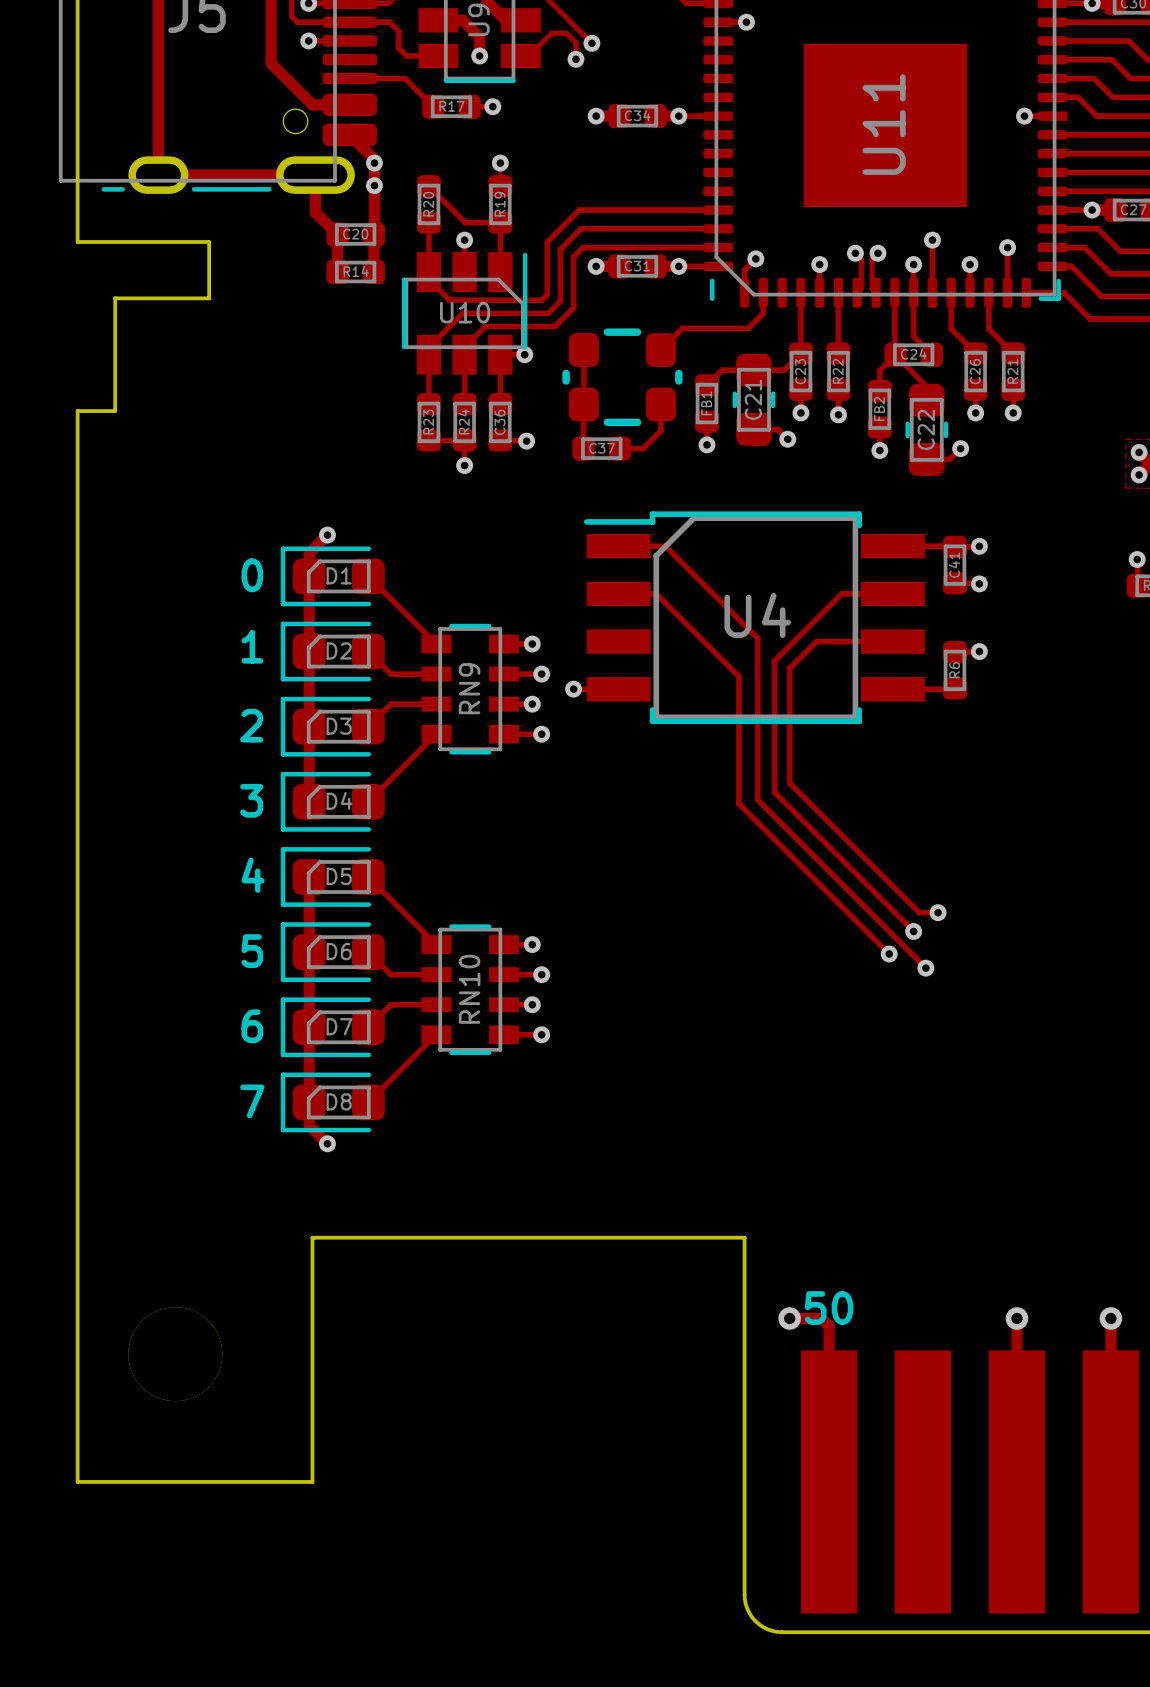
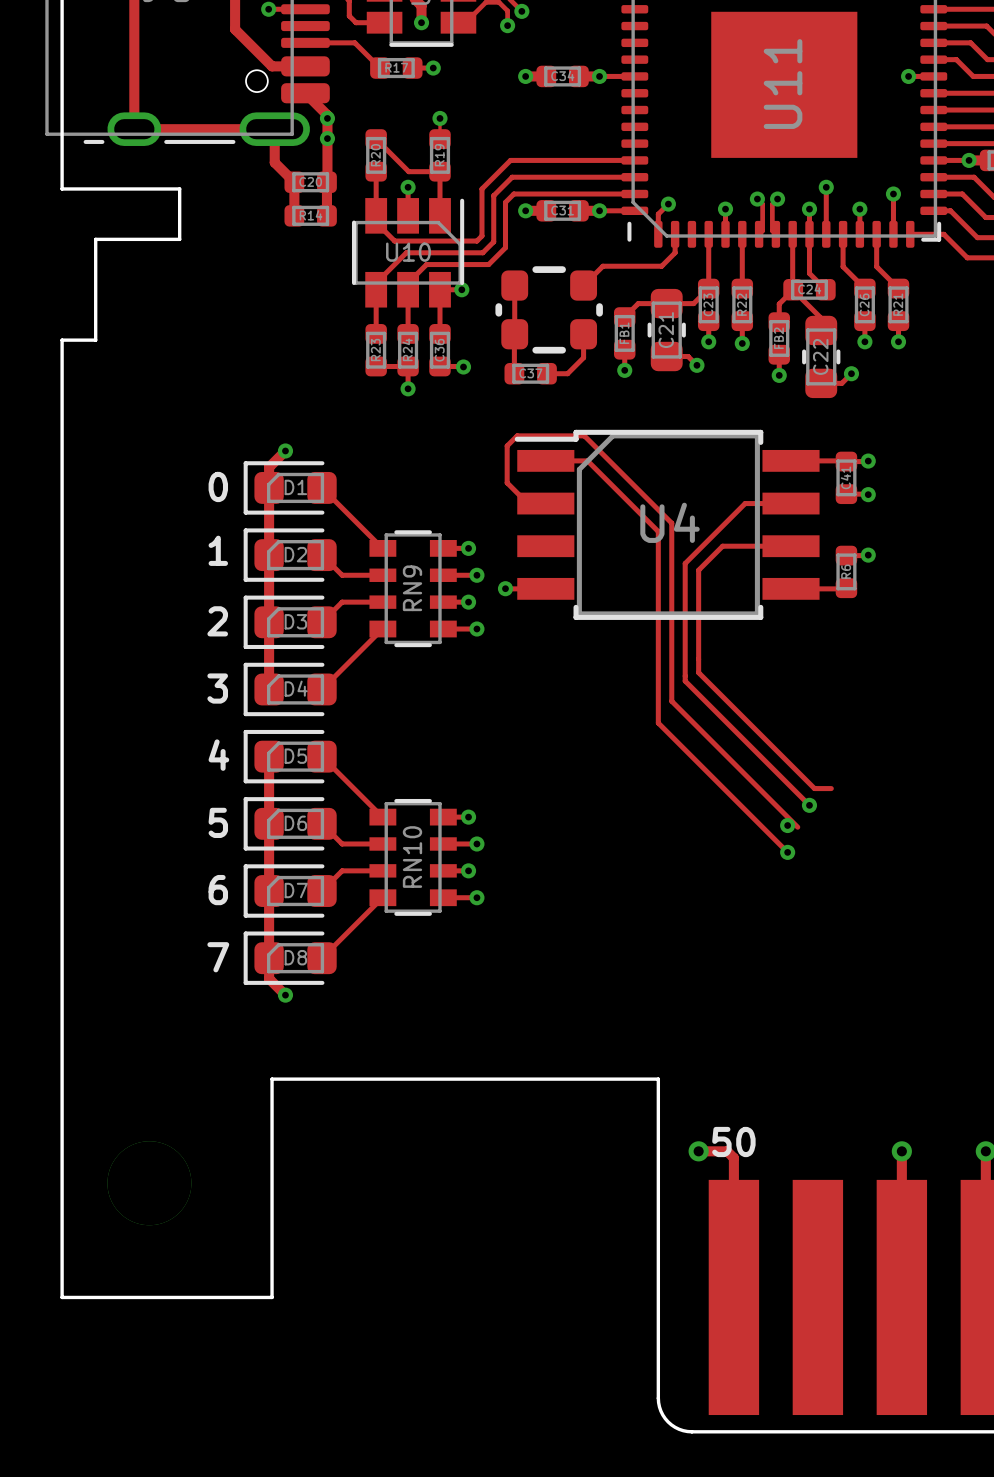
track: (618, 593) (656, 593) (738, 676) (738, 803) (889, 954) -> (545, 503) (527, 503) (507, 482) (507, 445) (517, 435) (584, 435) (671, 523) (671, 701) (797, 827)
track: (744, 625) (757, 638) (757, 799) (925, 968) -> (658, 531) (658, 723) (787, 852)
via: (938, 912) -> none
via position: (925, 968) -> (787, 852)

